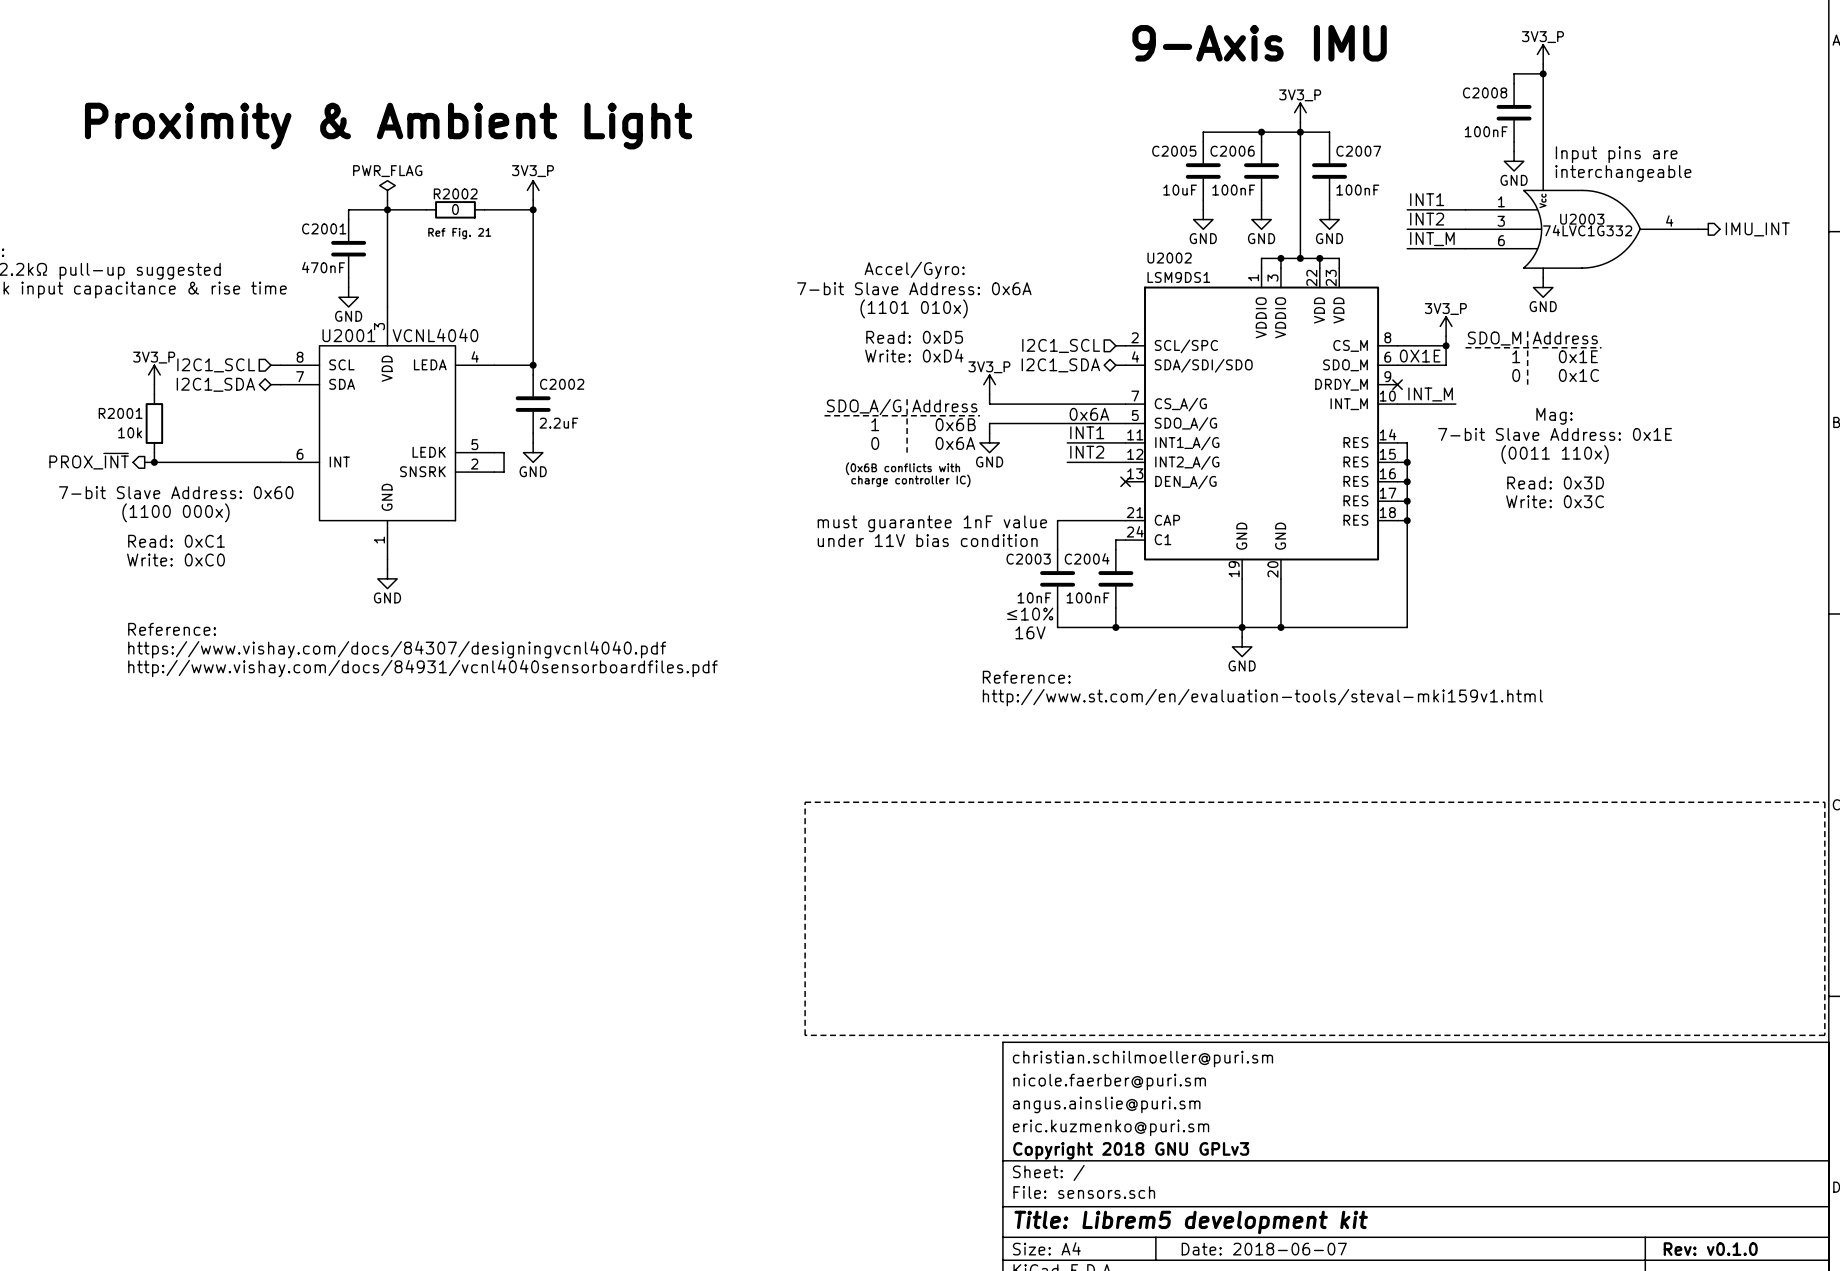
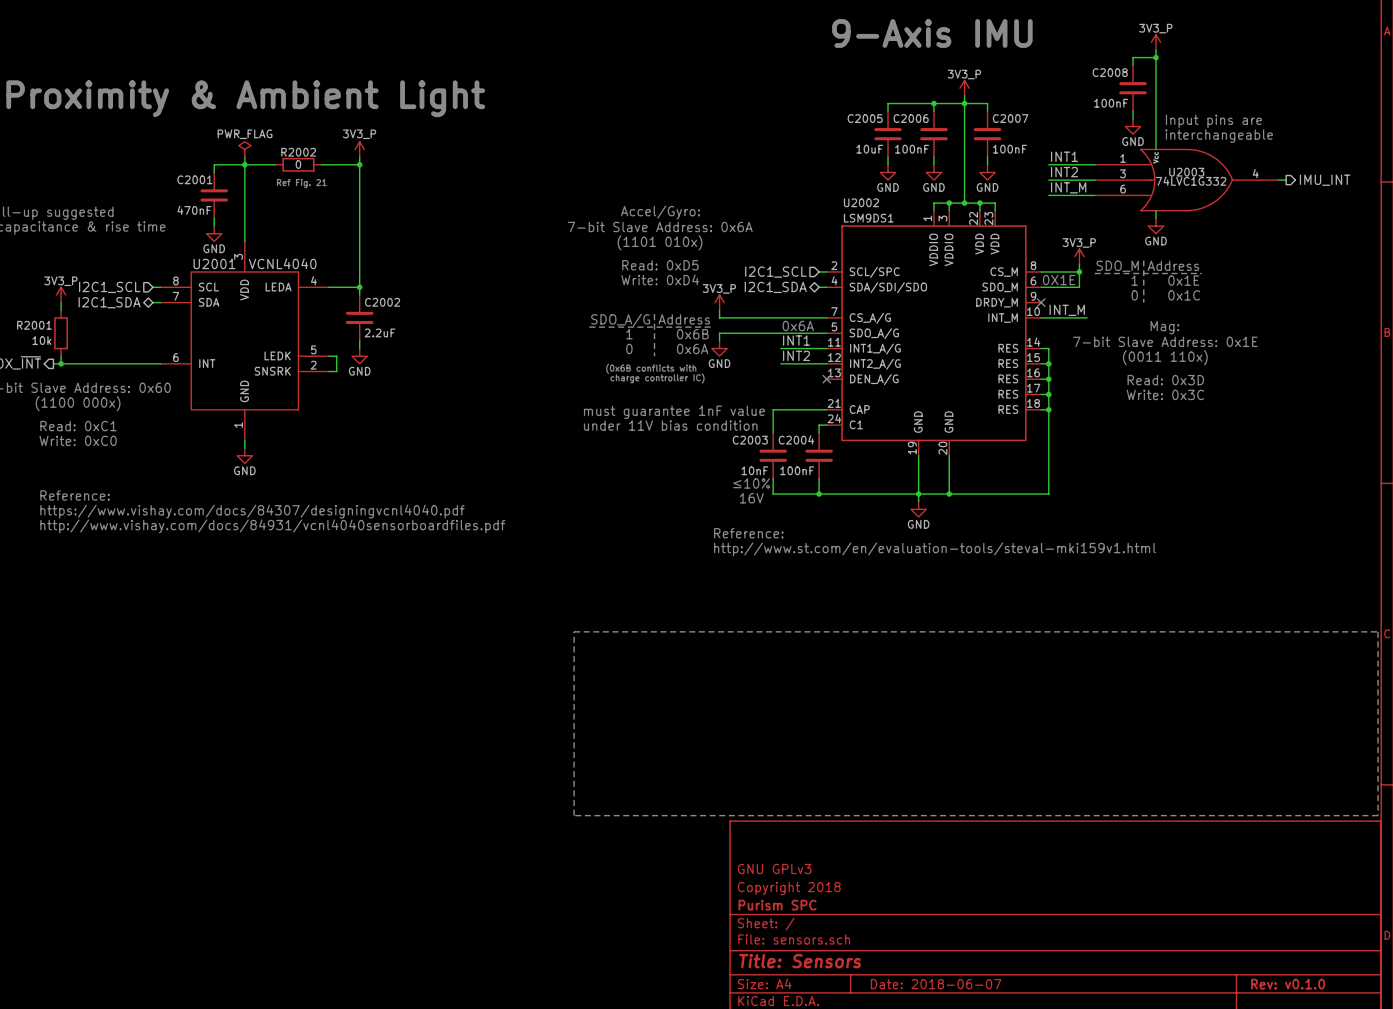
title block: christian.schilmoeller@puri.sm (1142, 1059) -> none
title block: nicole.faerber@puri.sm (1109, 1082) -> none
title block: angus.ainslie@puri.sm (1106, 1104) -> GNU GPLv3 (774, 868)
title block: eric.kuzmenko@puri.sm (1111, 1127) -> Copyright 2018 (789, 888)
title block: Copyright 2018 GNU GPLv3 (1131, 1150) -> Purism SPC (777, 905)
title block: Title: Librem5 development kit (1191, 1222) -> Title: Sensors (800, 961)

